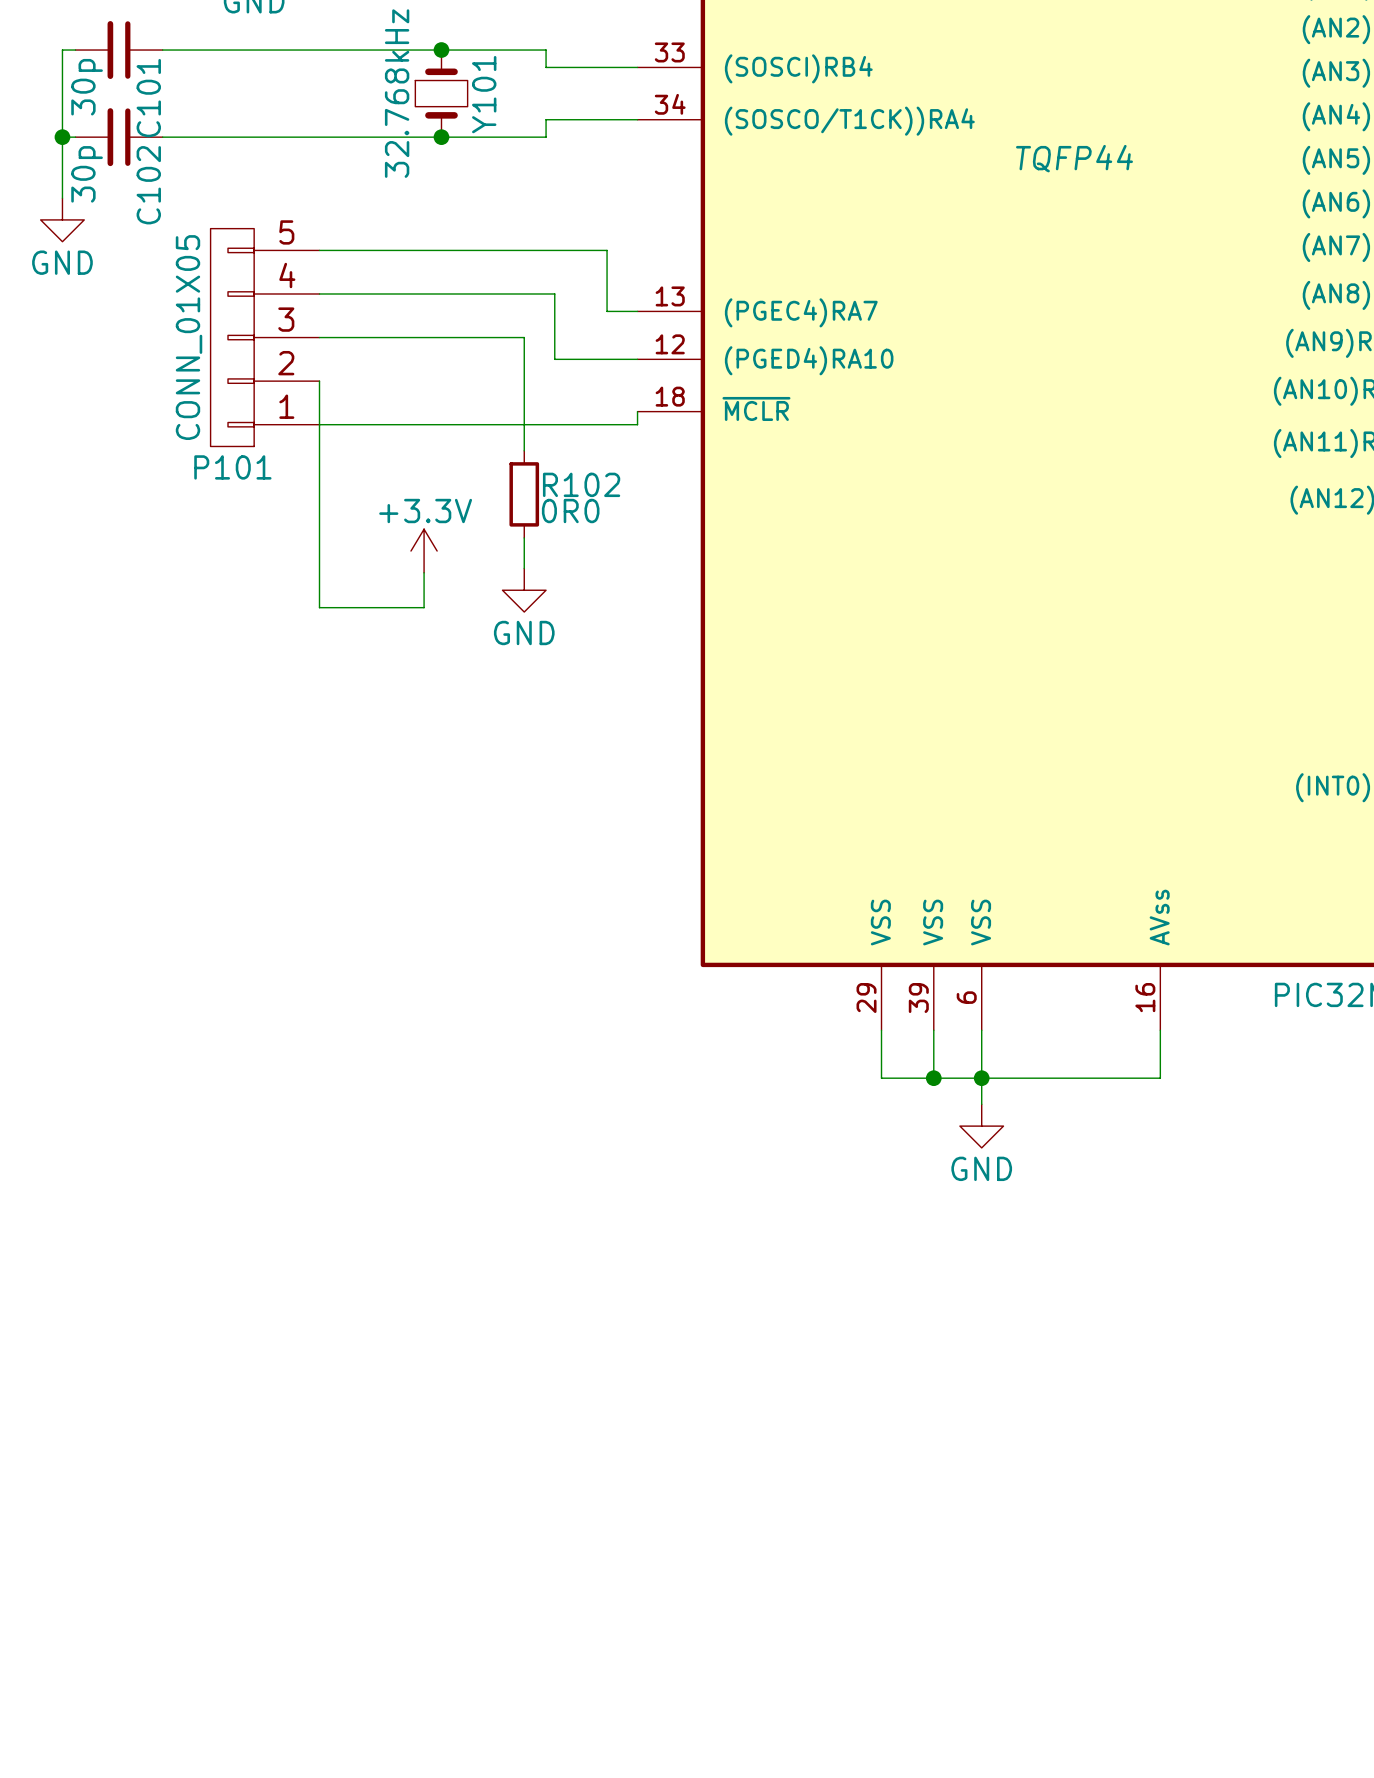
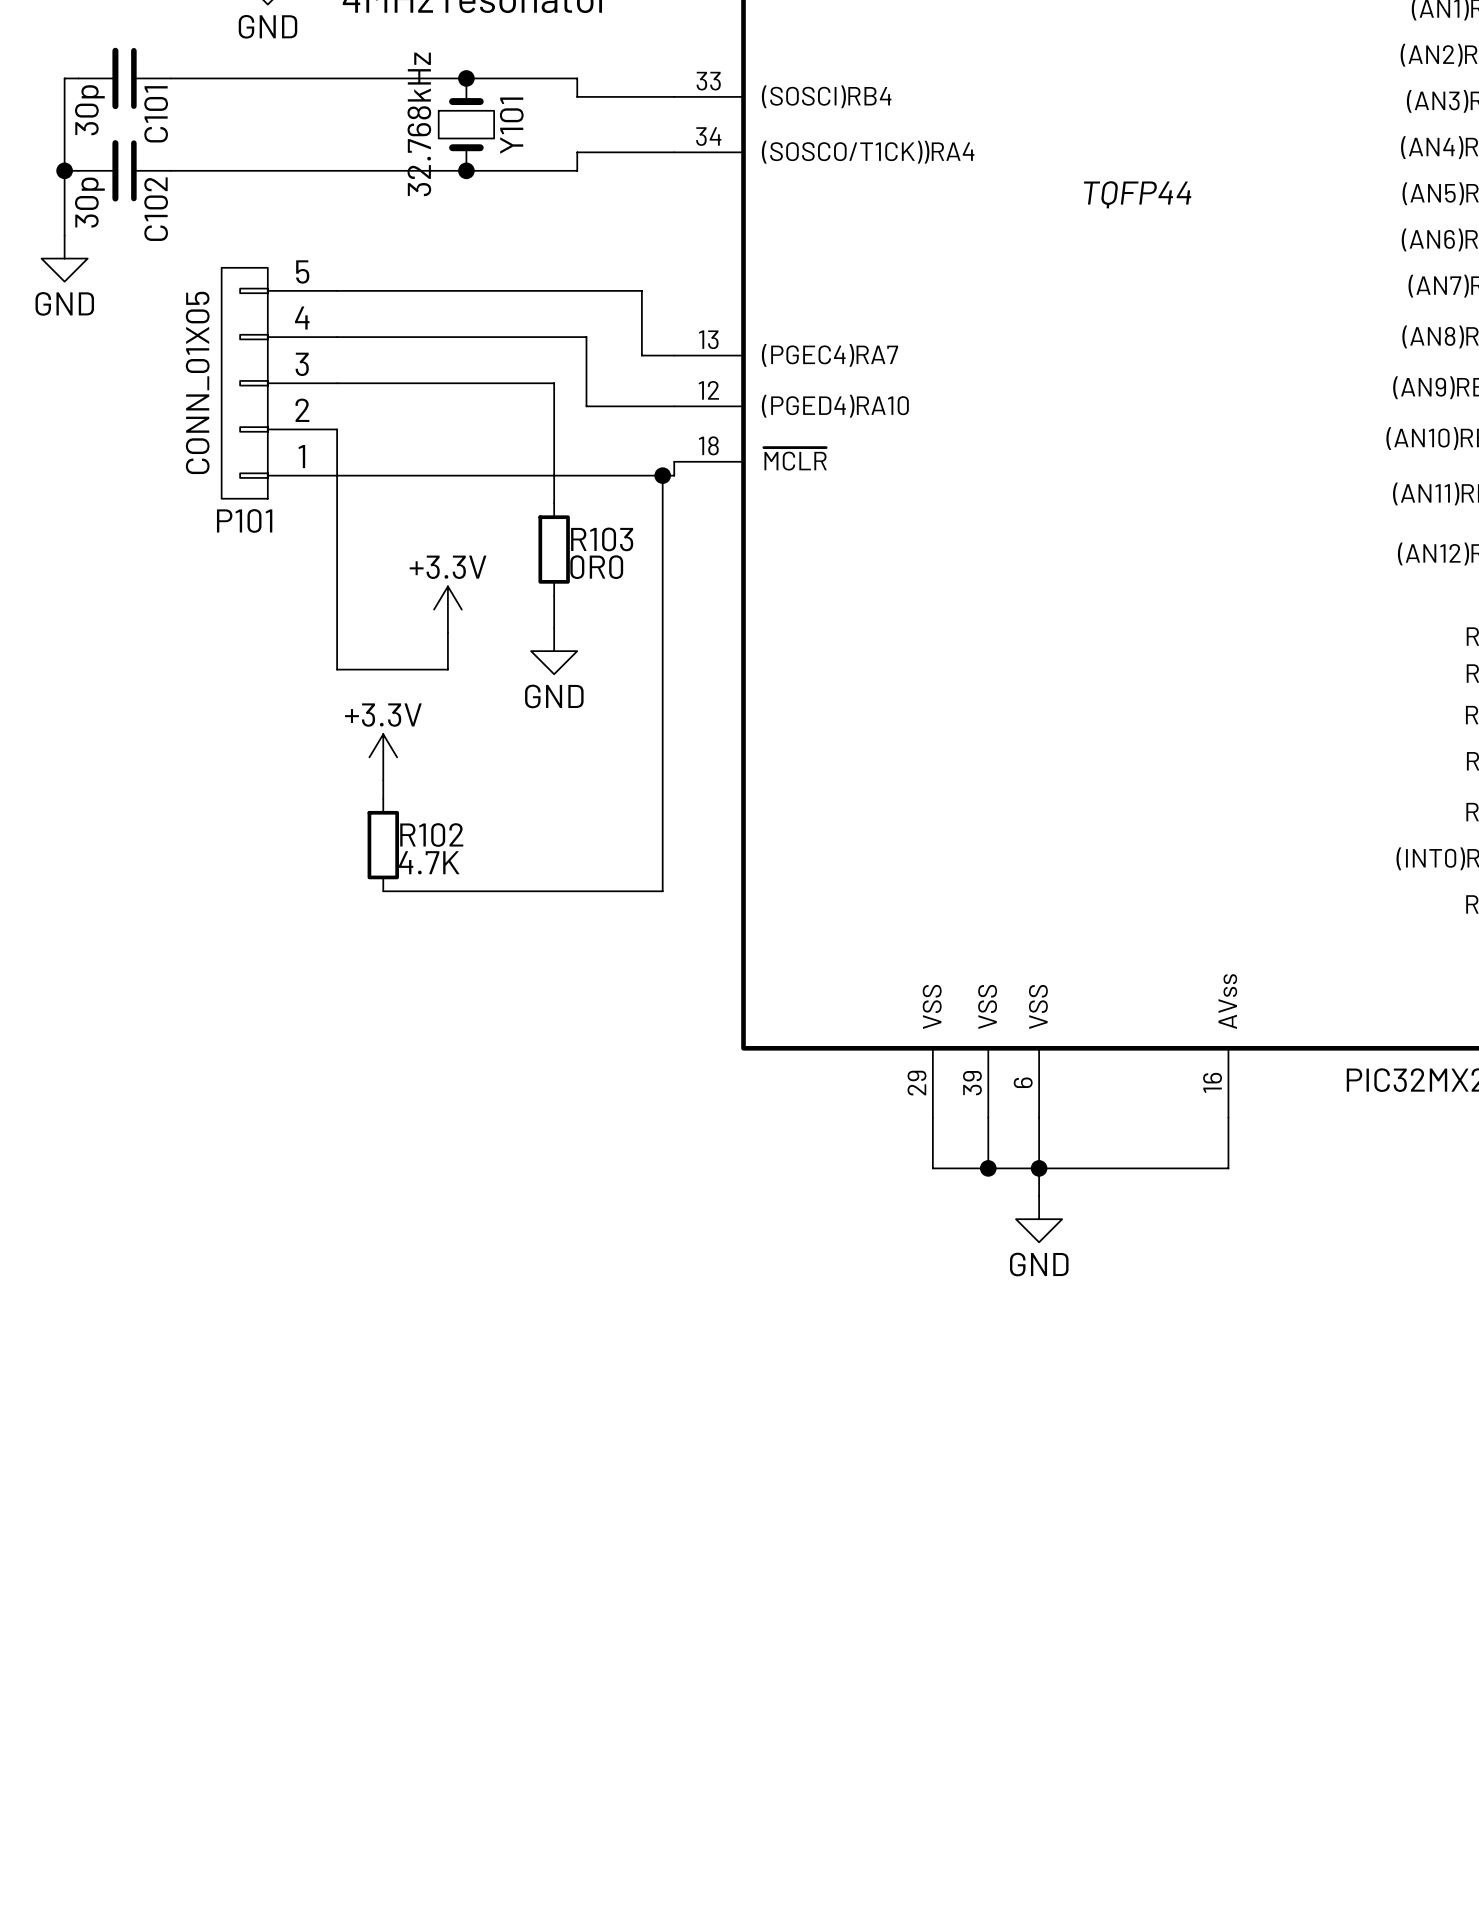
wire: none -> (662, 475) (662, 891) (383, 891)
junction: none -> (662, 475)
R102 name: R102 (581, 484) -> R103 (602, 539)
power symbol: none -> +3.3V (383, 757)
wire: none -> (383, 780) (383, 798)
R102: none -> 4.7K (383, 845)

